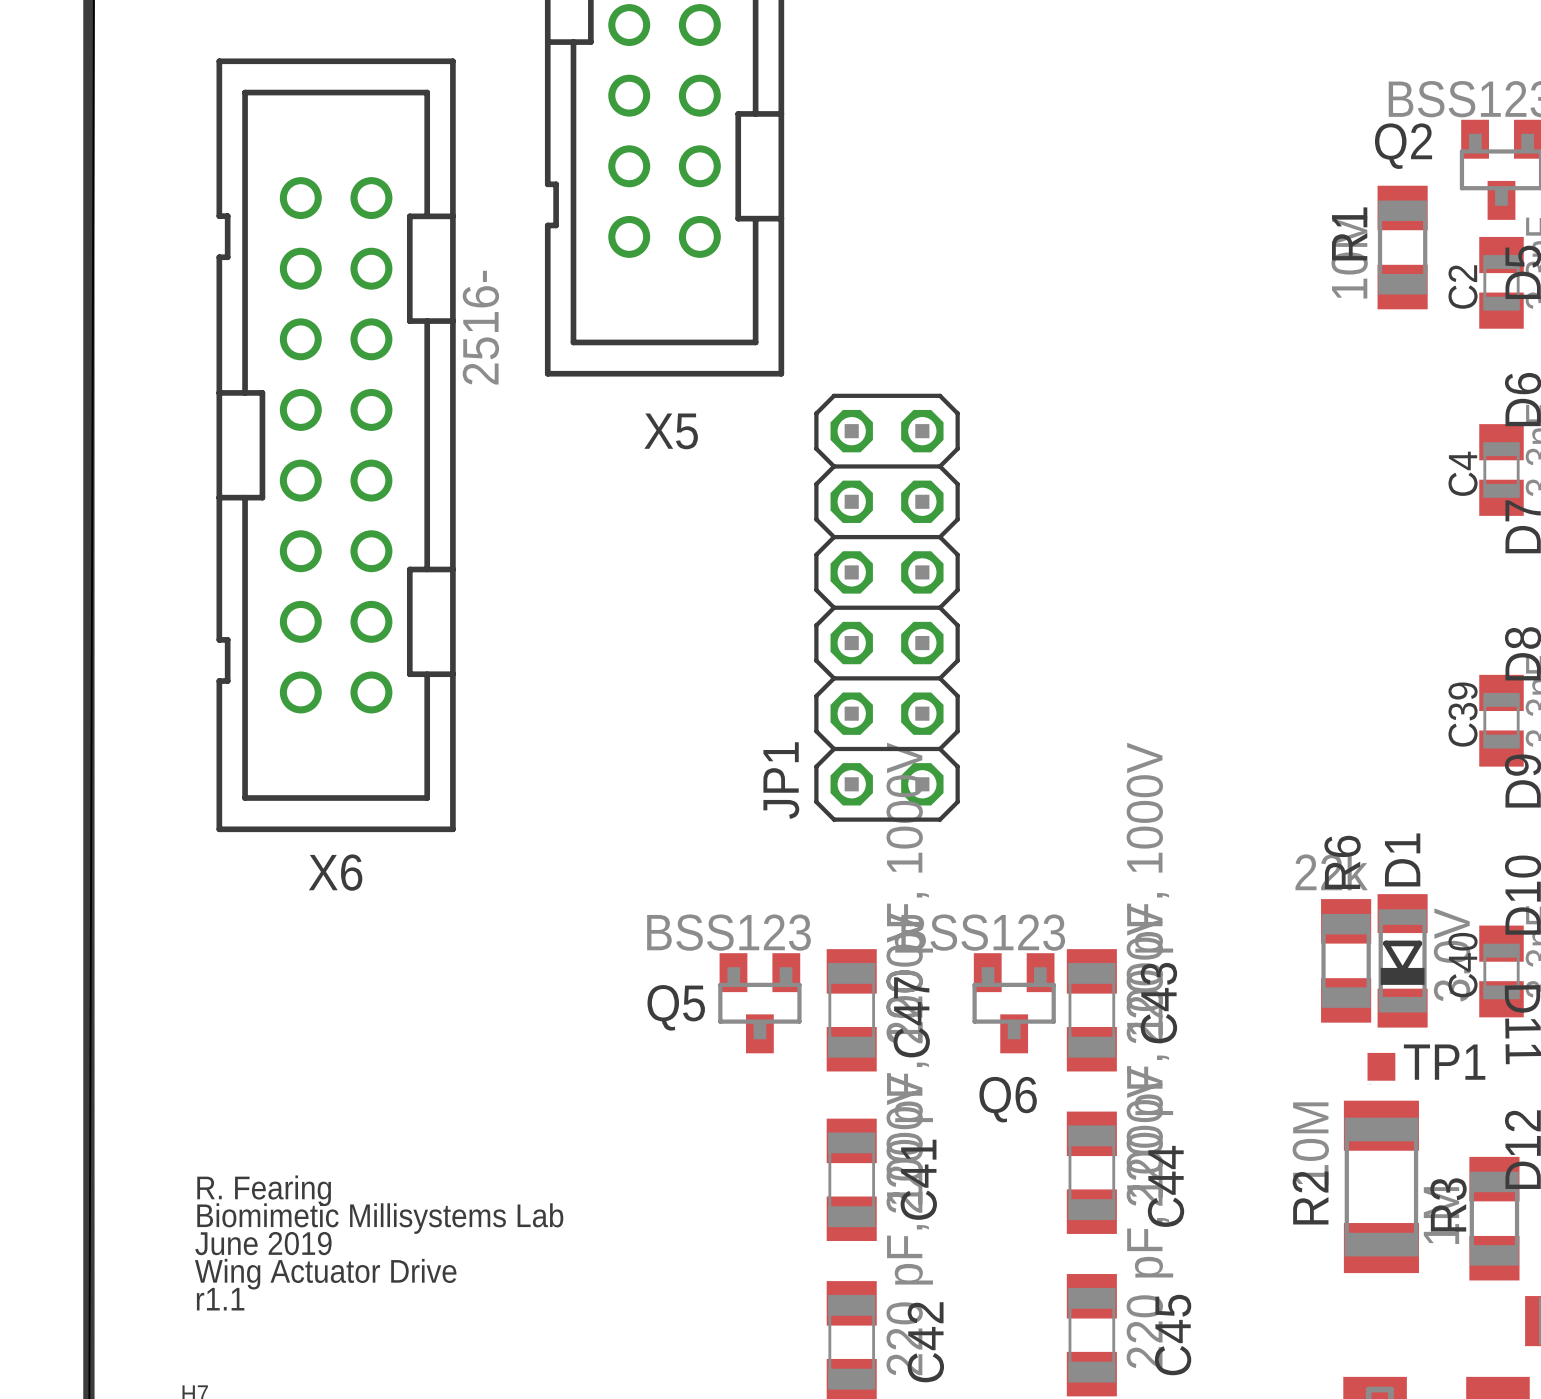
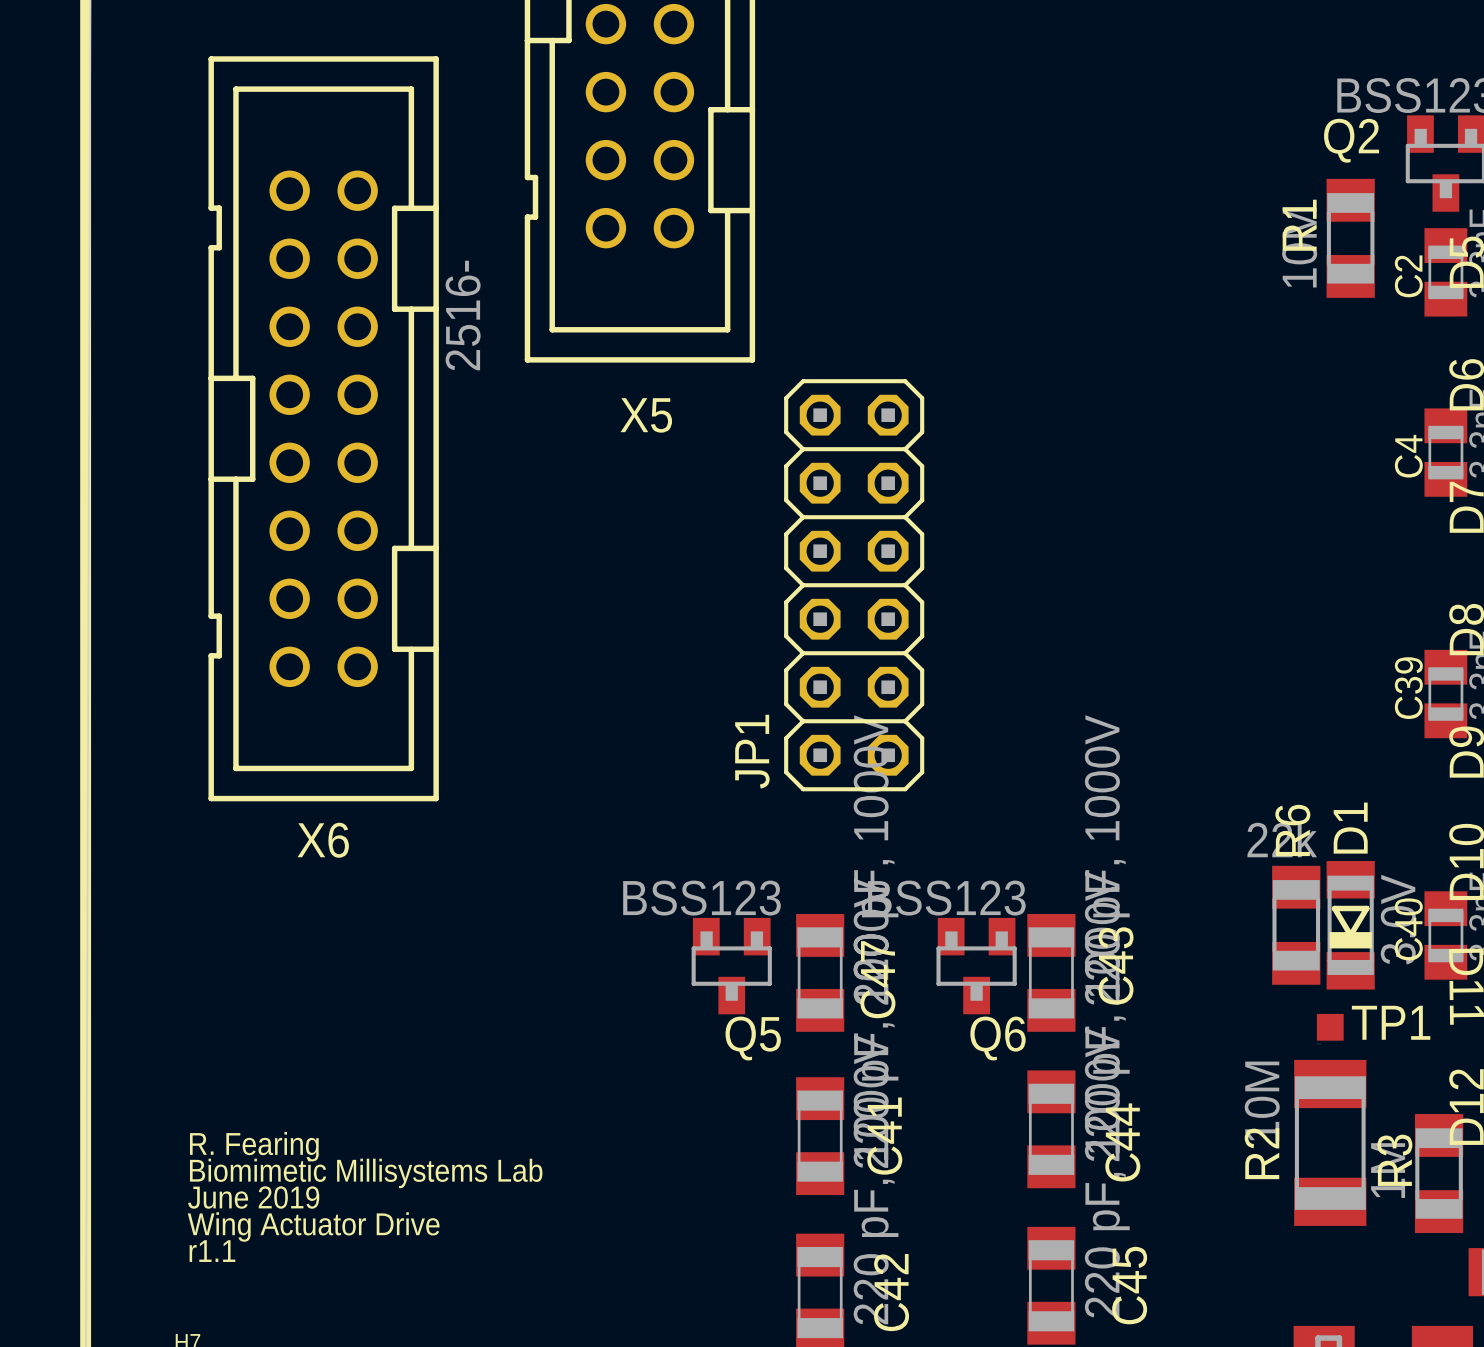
Q5 name position: Q5 (676, 1007) -> Q5 (753, 1038)
Q6 name position: Q6 (1008, 1099) -> Q6 (998, 1038)

